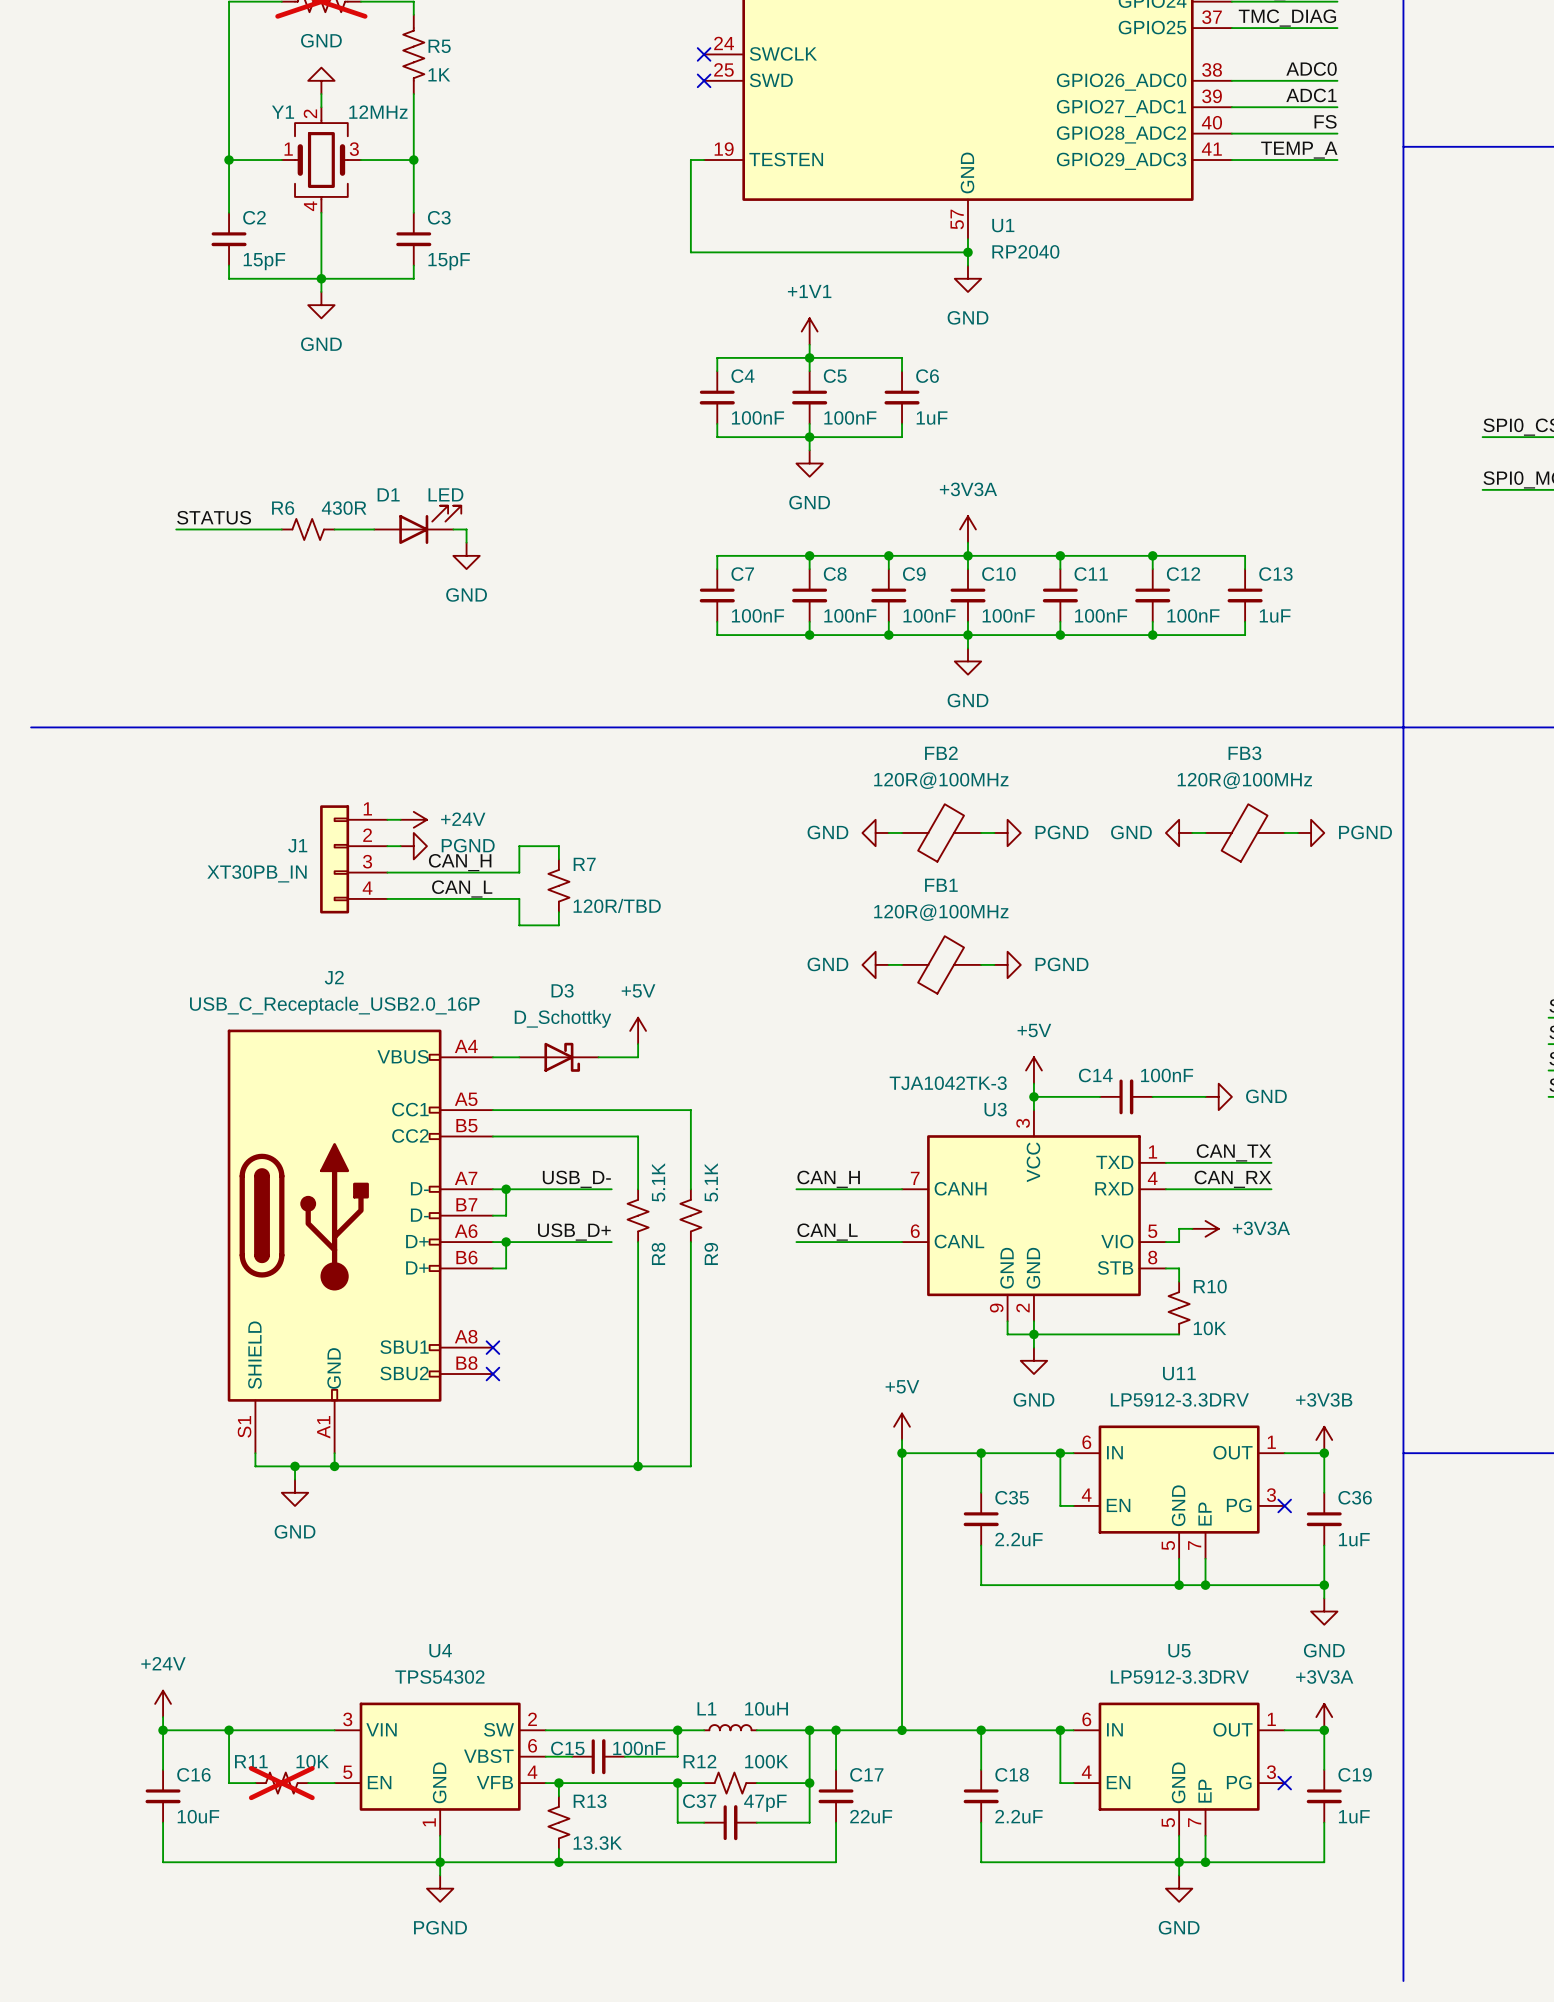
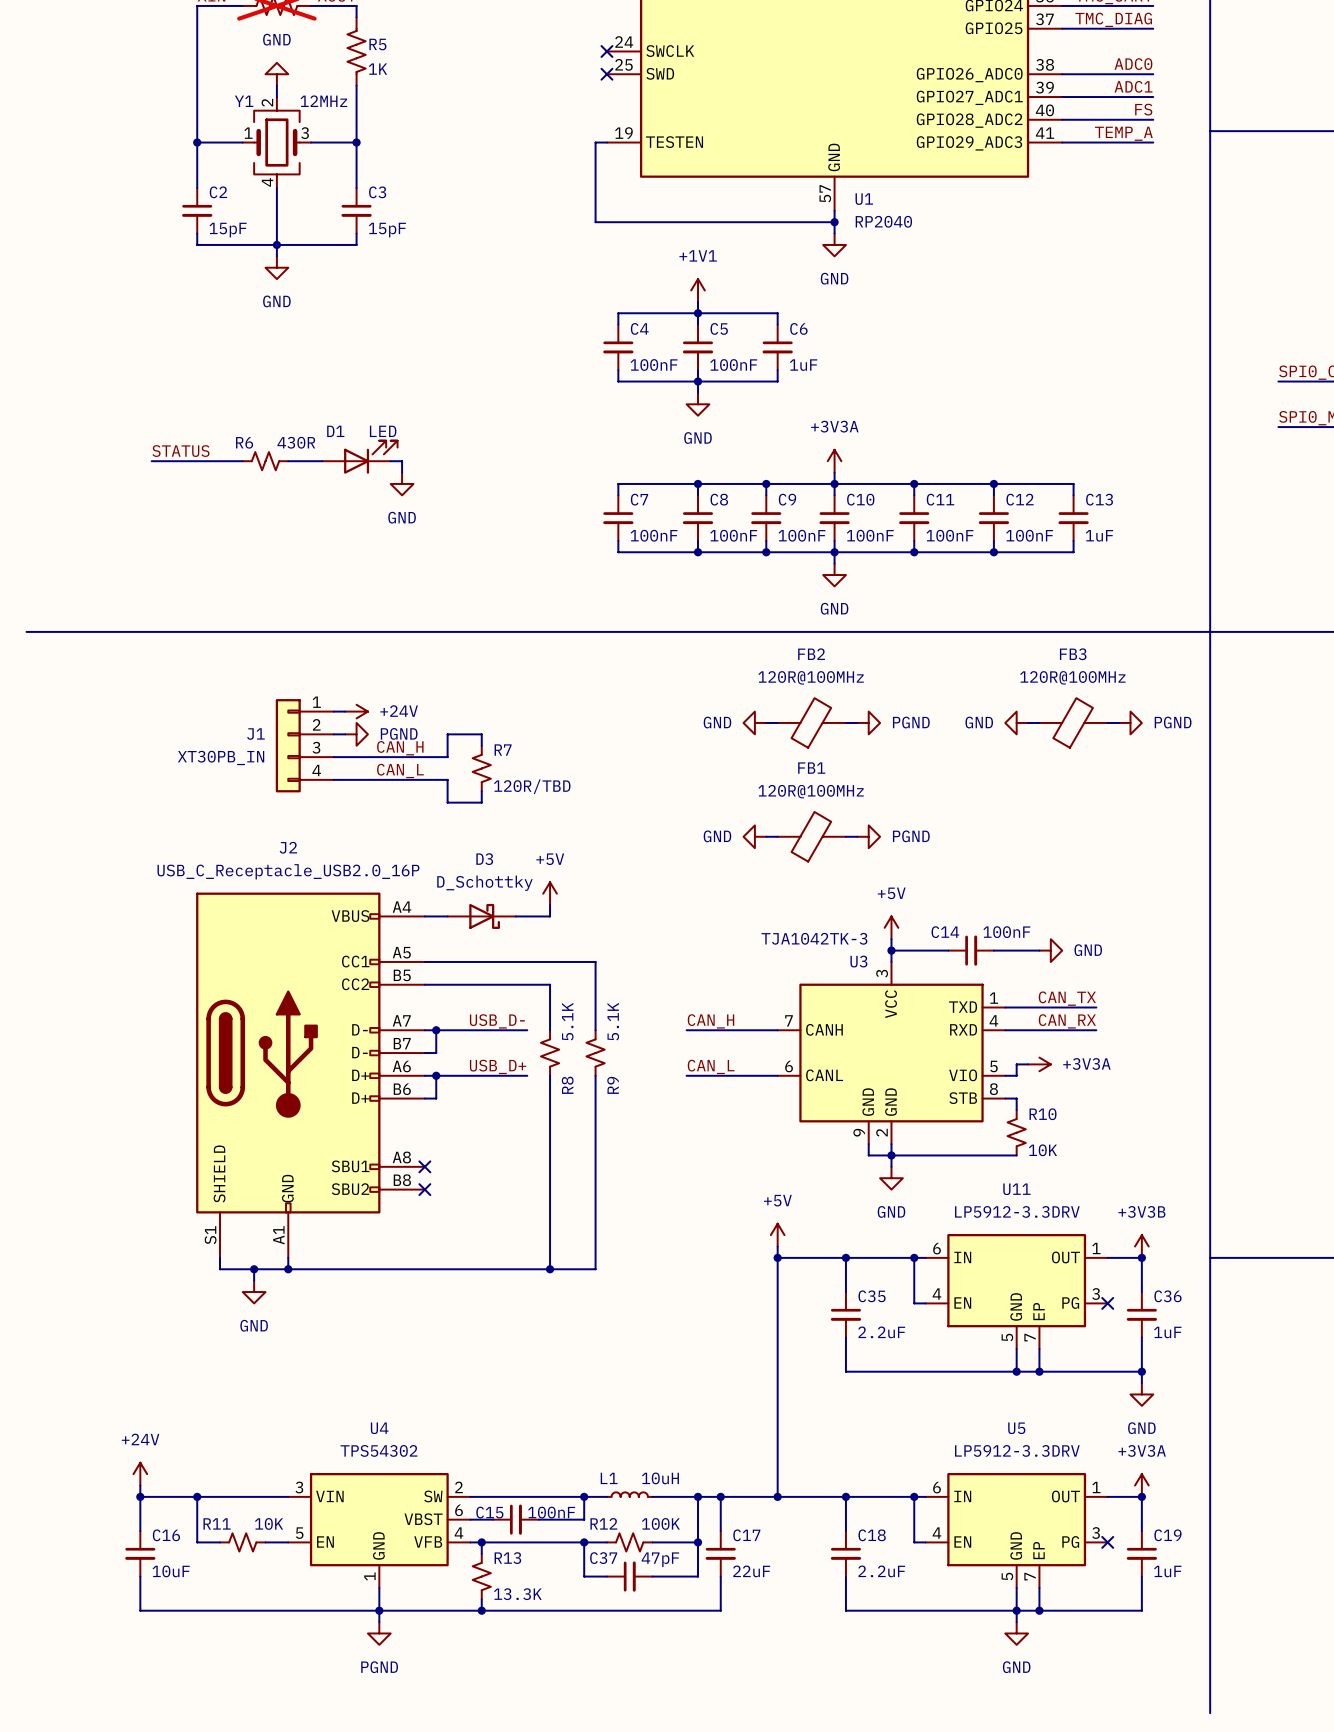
R11 do-not-place cross: (281, 1783) -> none

